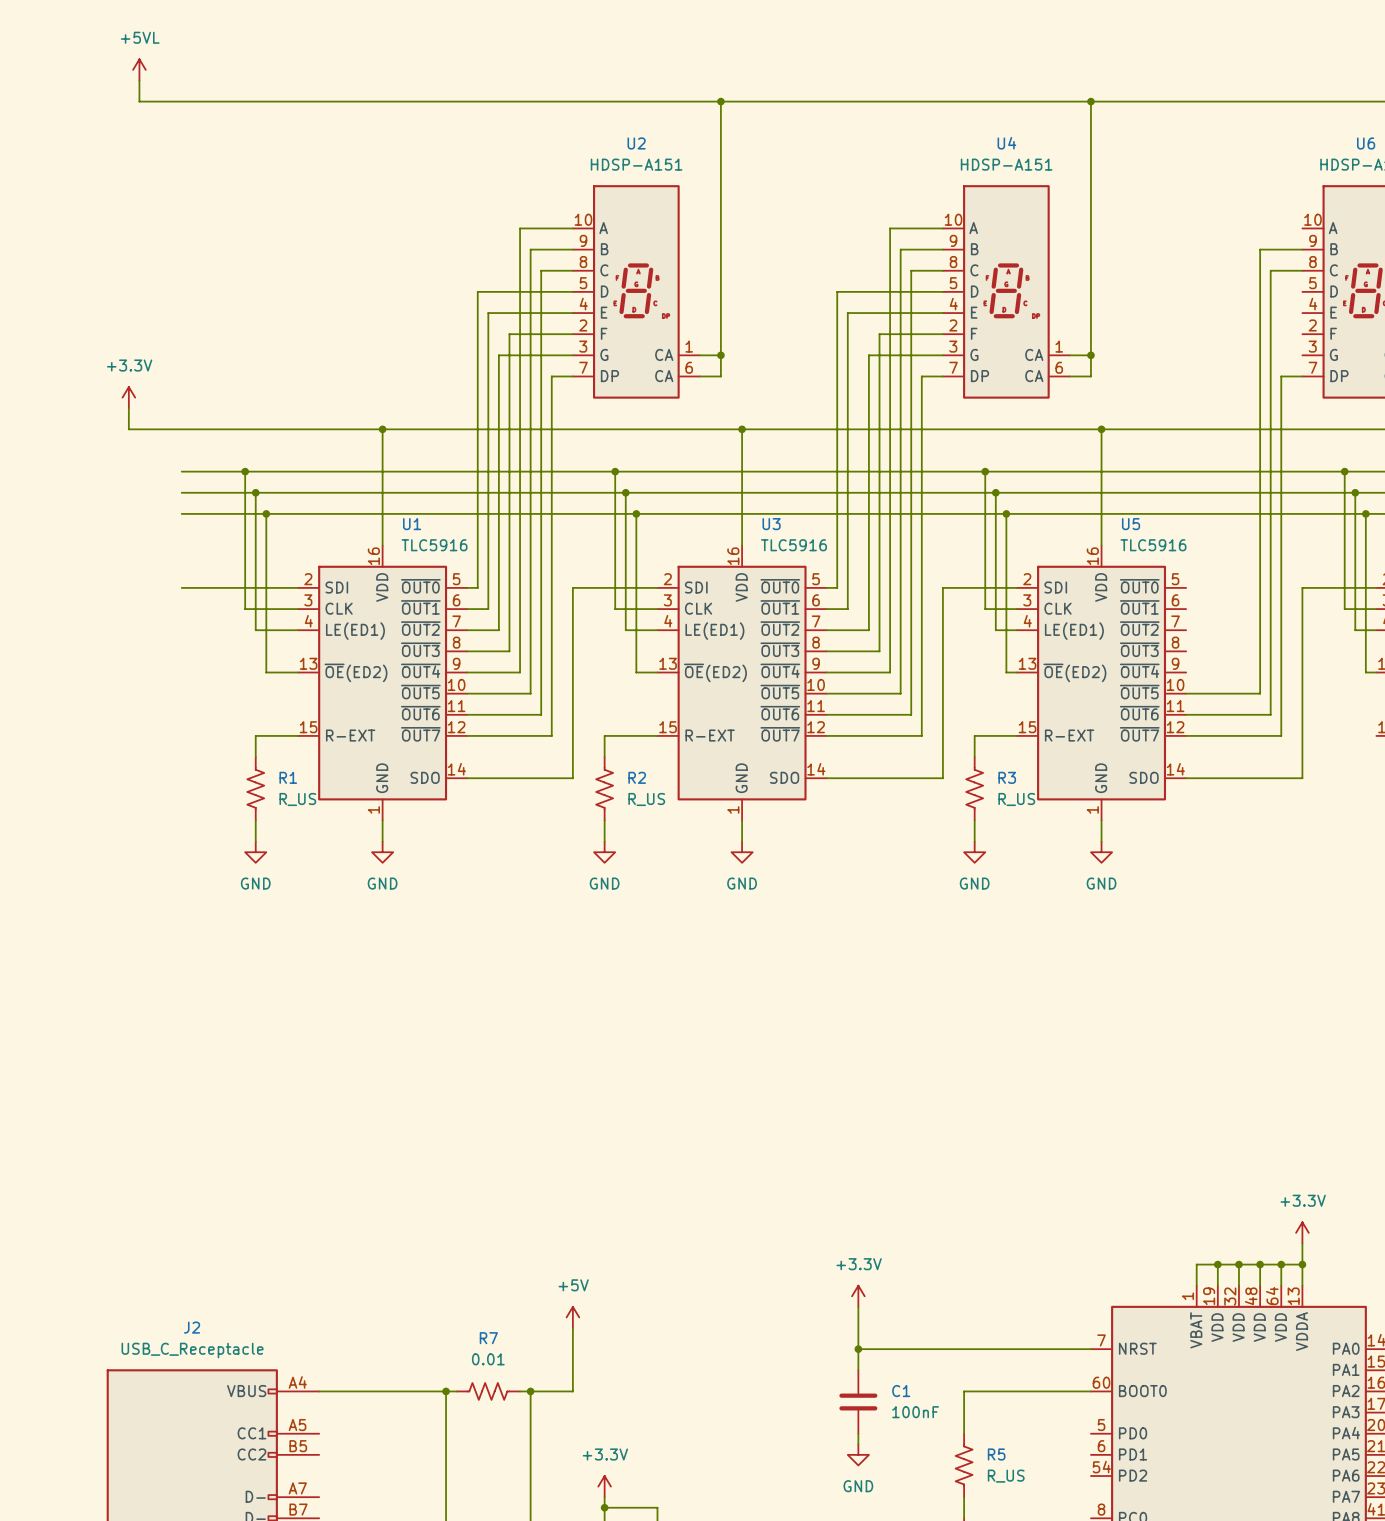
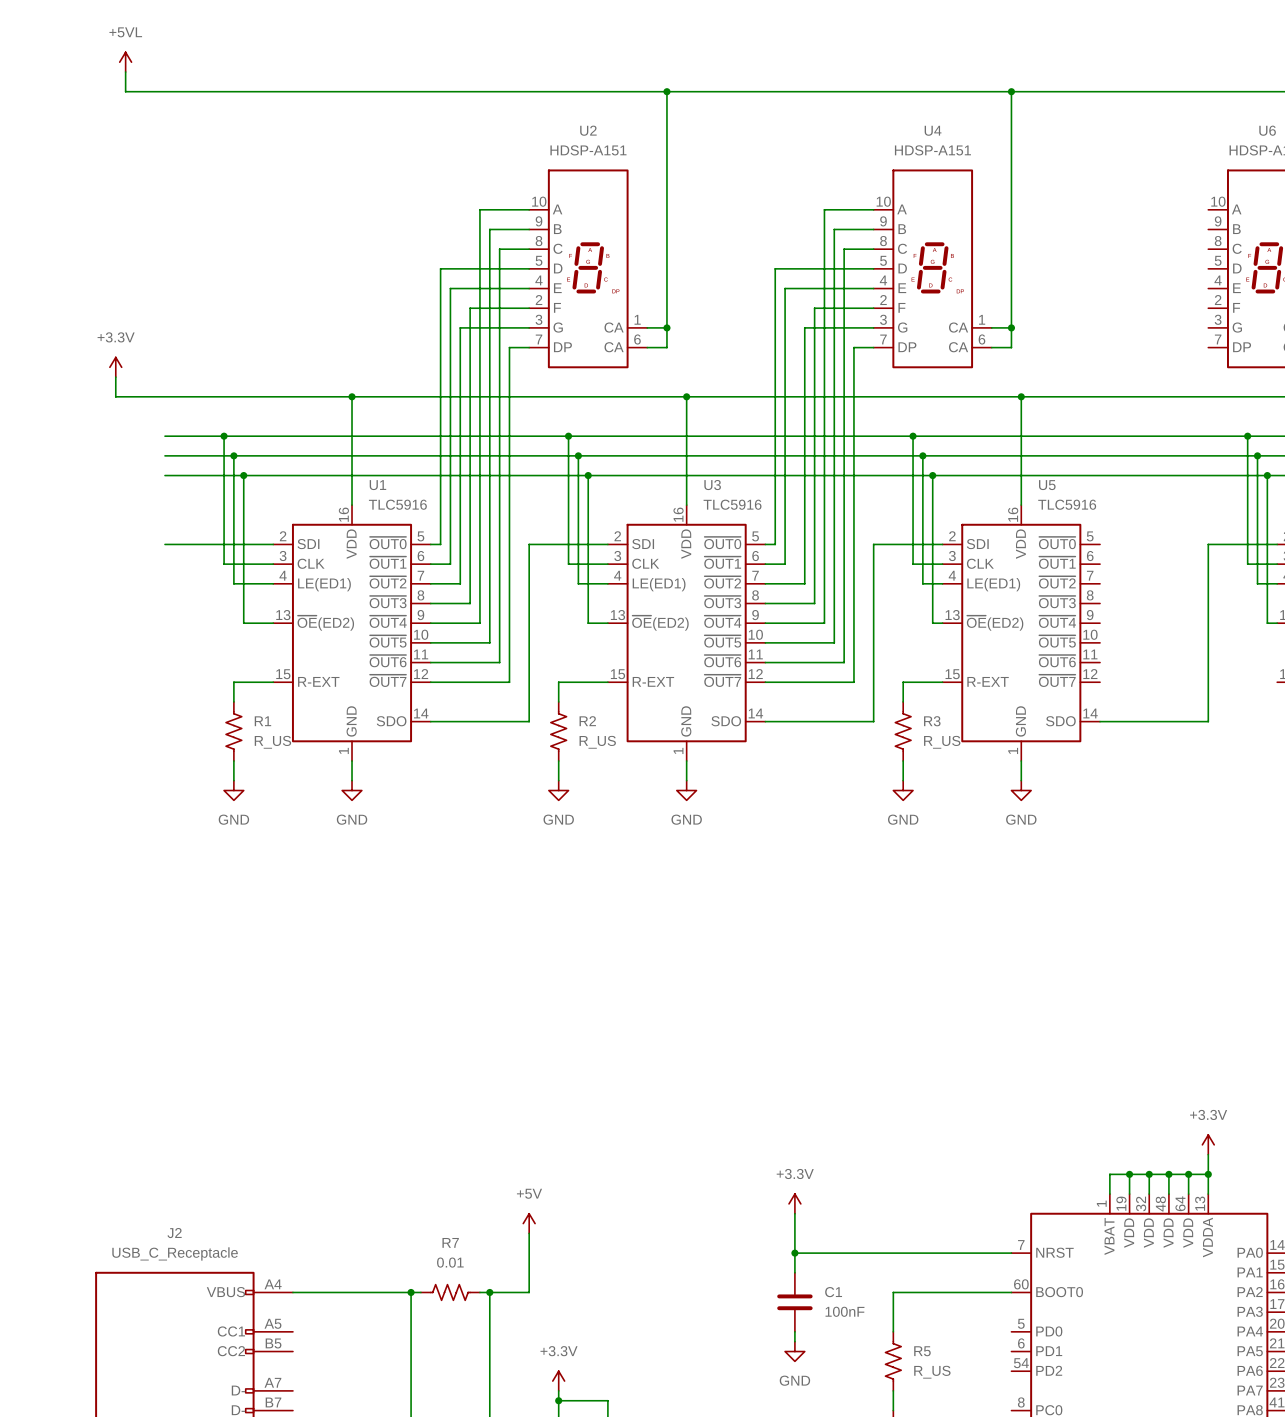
wire: (1302, 249) (1260, 249) (1260, 693) (1186, 693) -> none
wire: (1302, 270) (1270, 270) (1270, 714) (1186, 714) -> none
wire: (1302, 376) (1281, 376) (1281, 735) (1186, 735) -> none

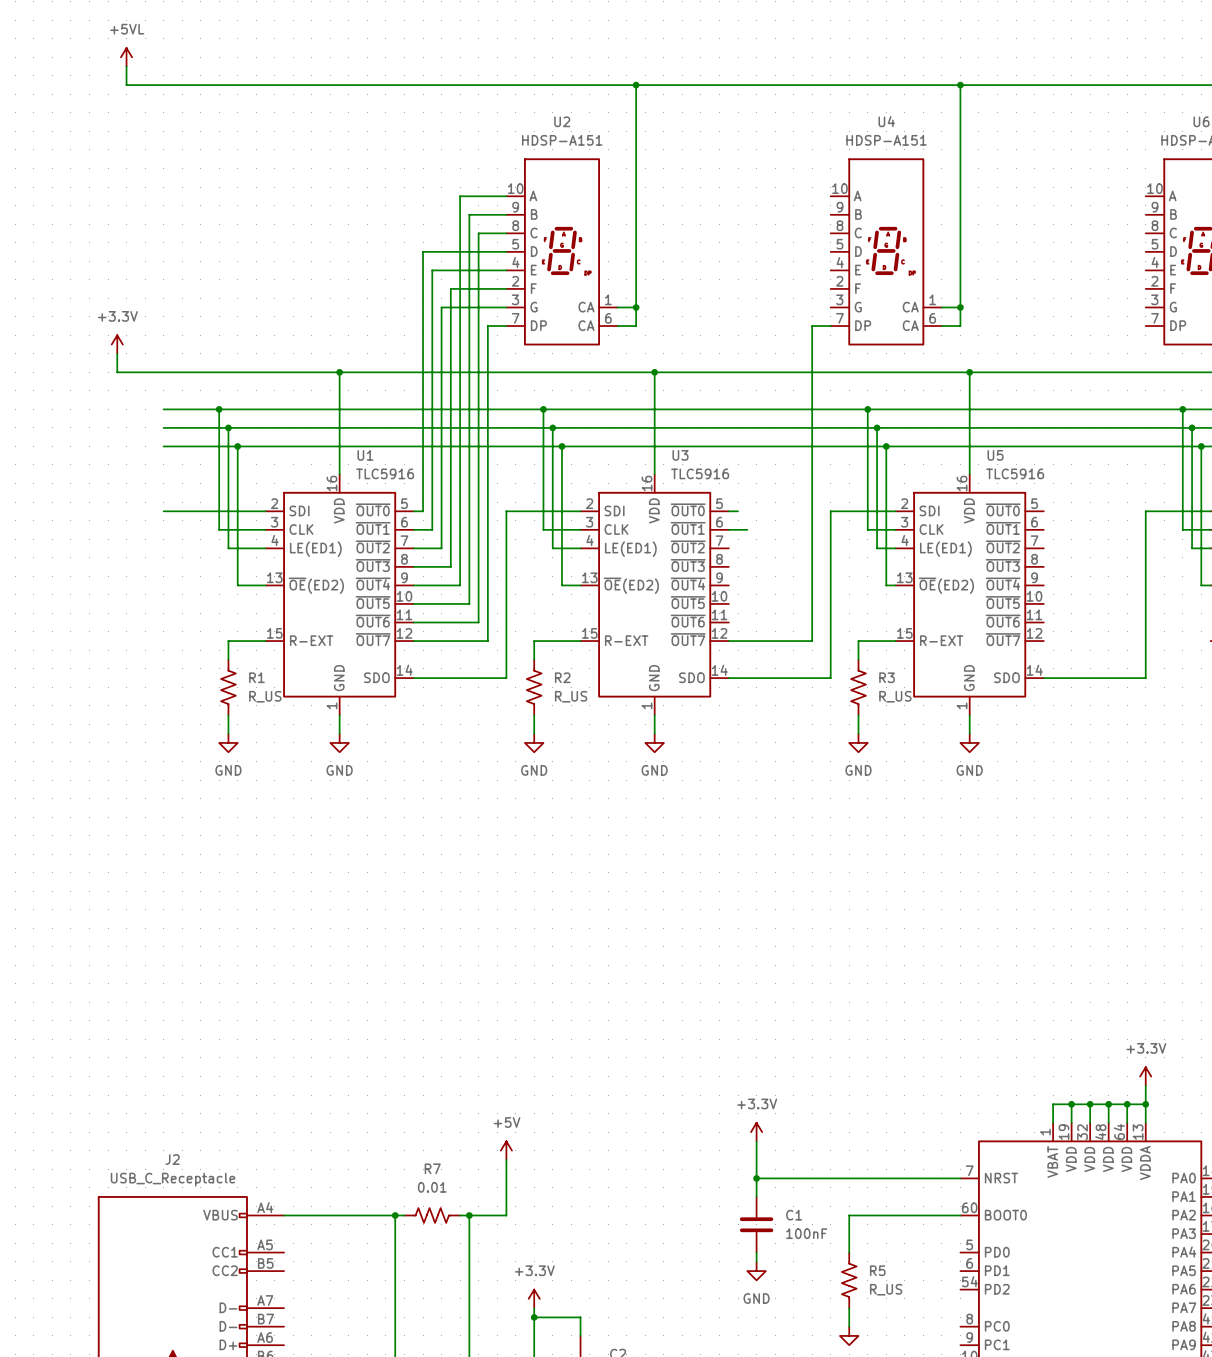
wire: (873, 209) (824, 209) (824, 623) (765, 623) -> none
wire: (873, 229) (834, 229) (834, 642) (765, 642) -> none
wire: (873, 249) (844, 249) (844, 662) (765, 662) -> none
wire: (873, 268) (775, 268) (775, 544) -> none
wire: (873, 288) (785, 288) (785, 564) -> none
wire: (873, 308) (814, 308) (814, 603) (765, 603) -> none
wire: (873, 327) (804, 327) (804, 583) (765, 583) -> none

